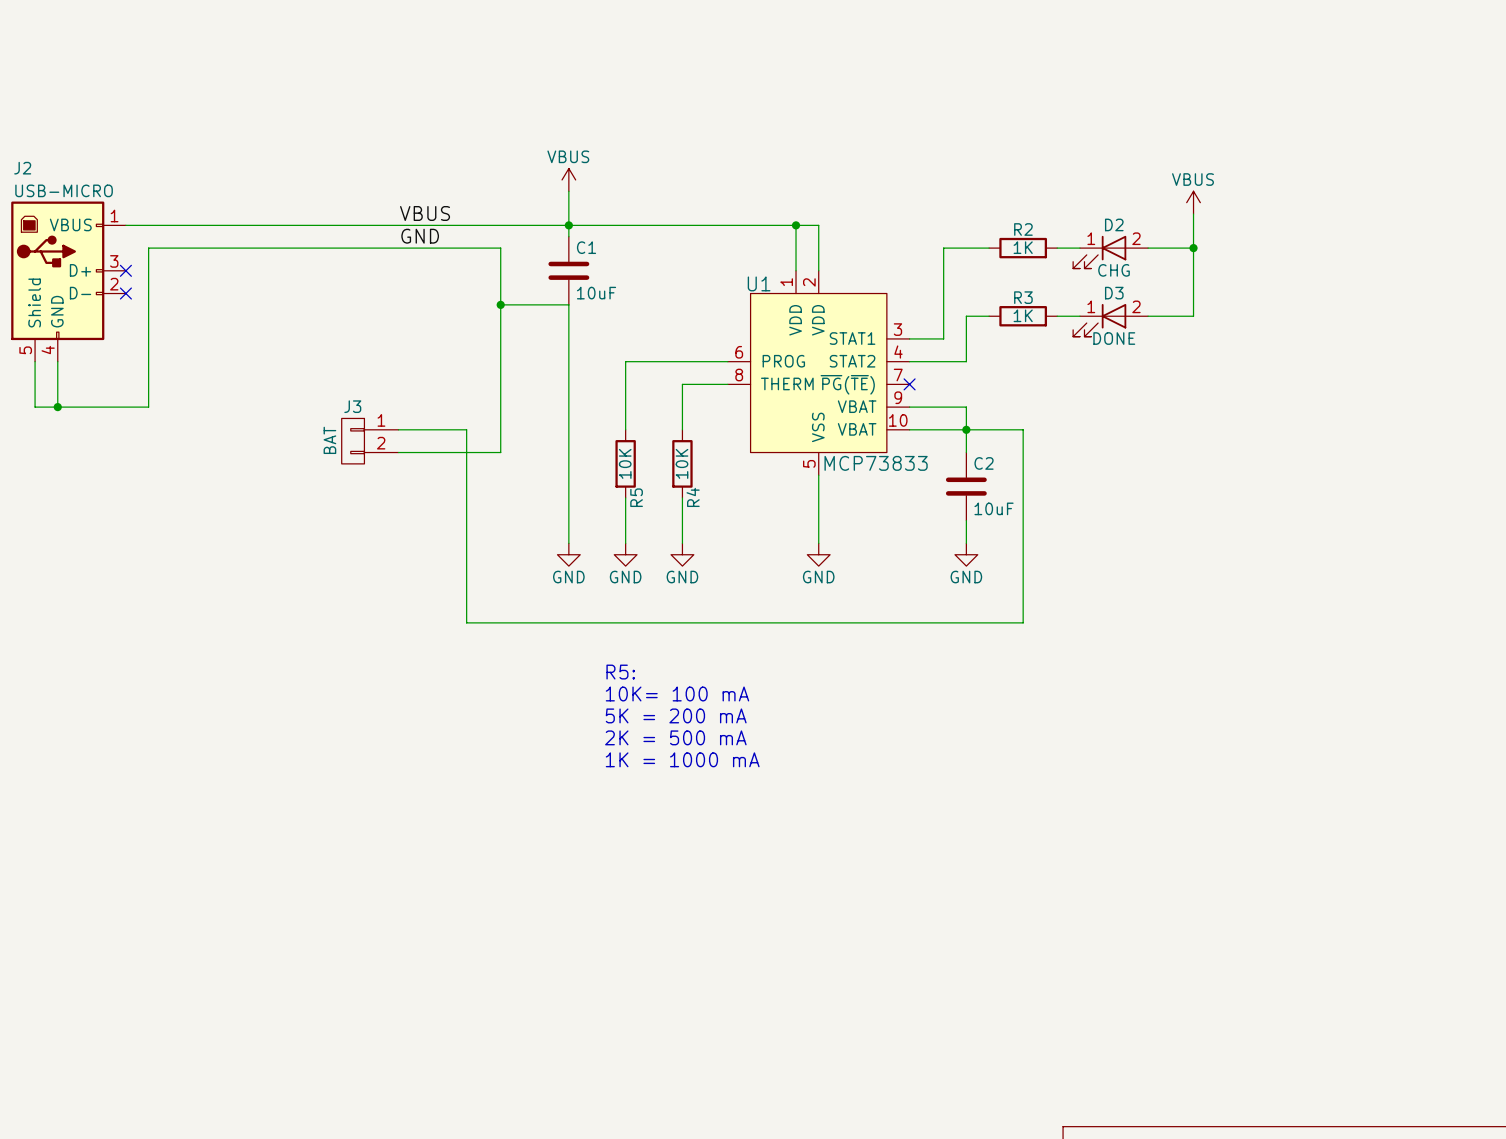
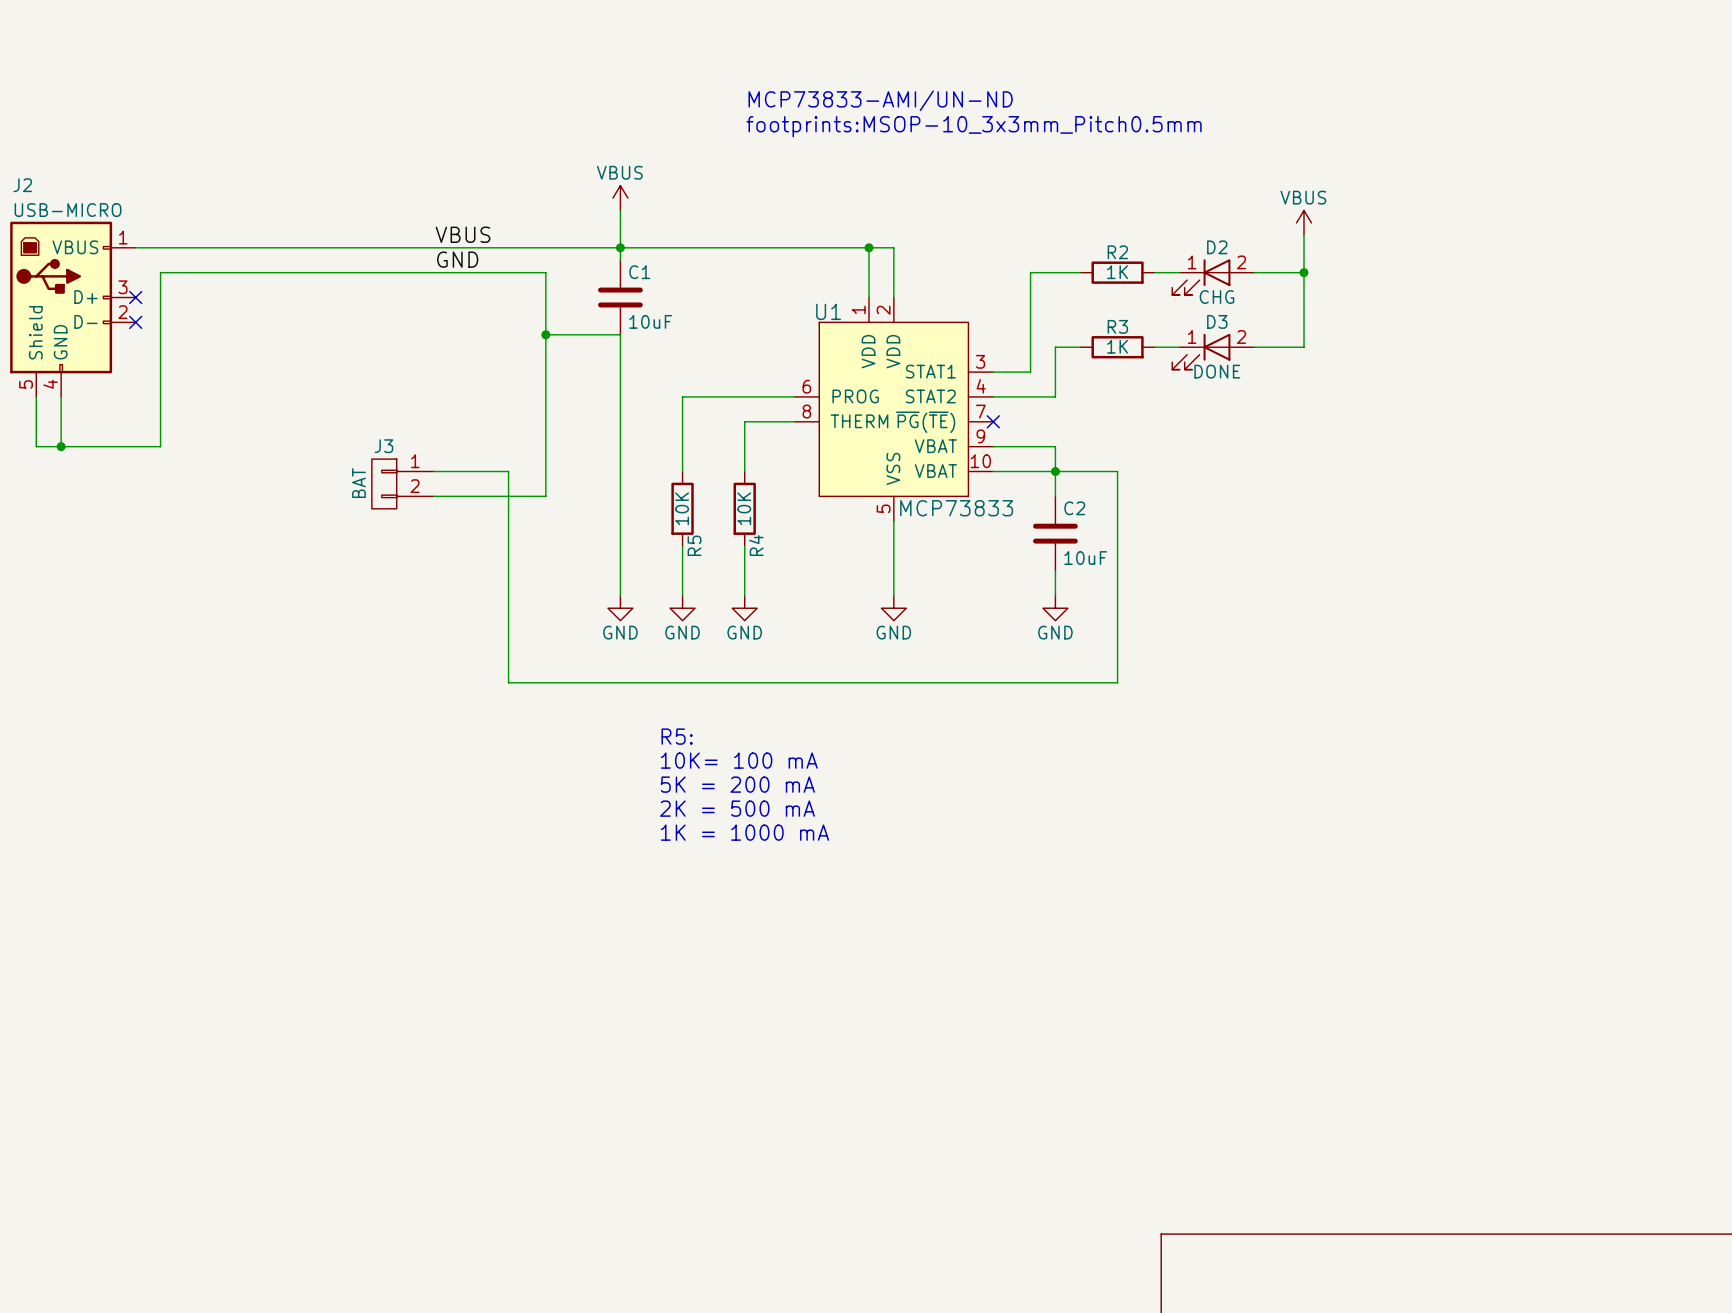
text: none -> MCP73833-AMI/UN-ND (880, 100)
text: none -> footprints:MSOP-10_3x3mm_Pitch0.5mm (974, 126)

